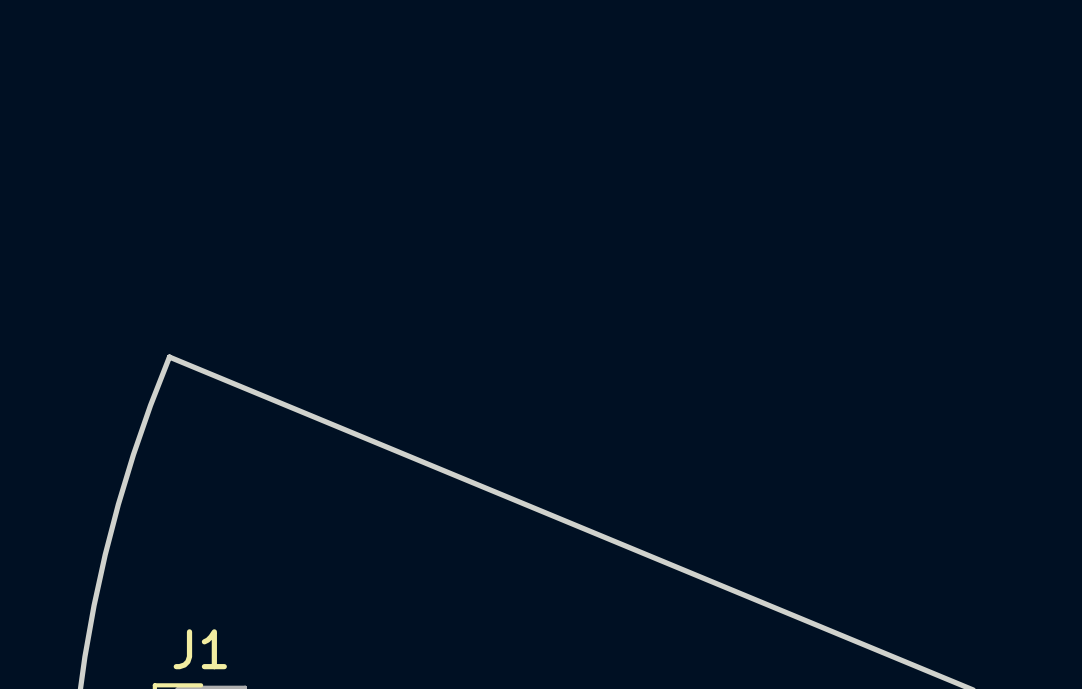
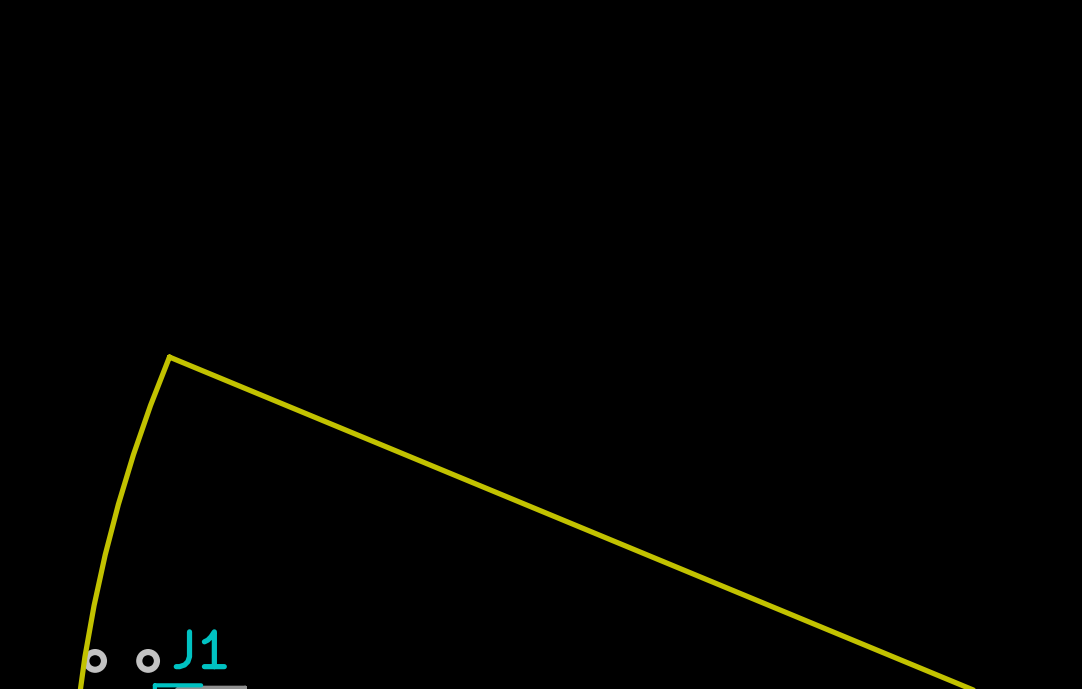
via: none -> (95, 660)
via: none -> (148, 660)

